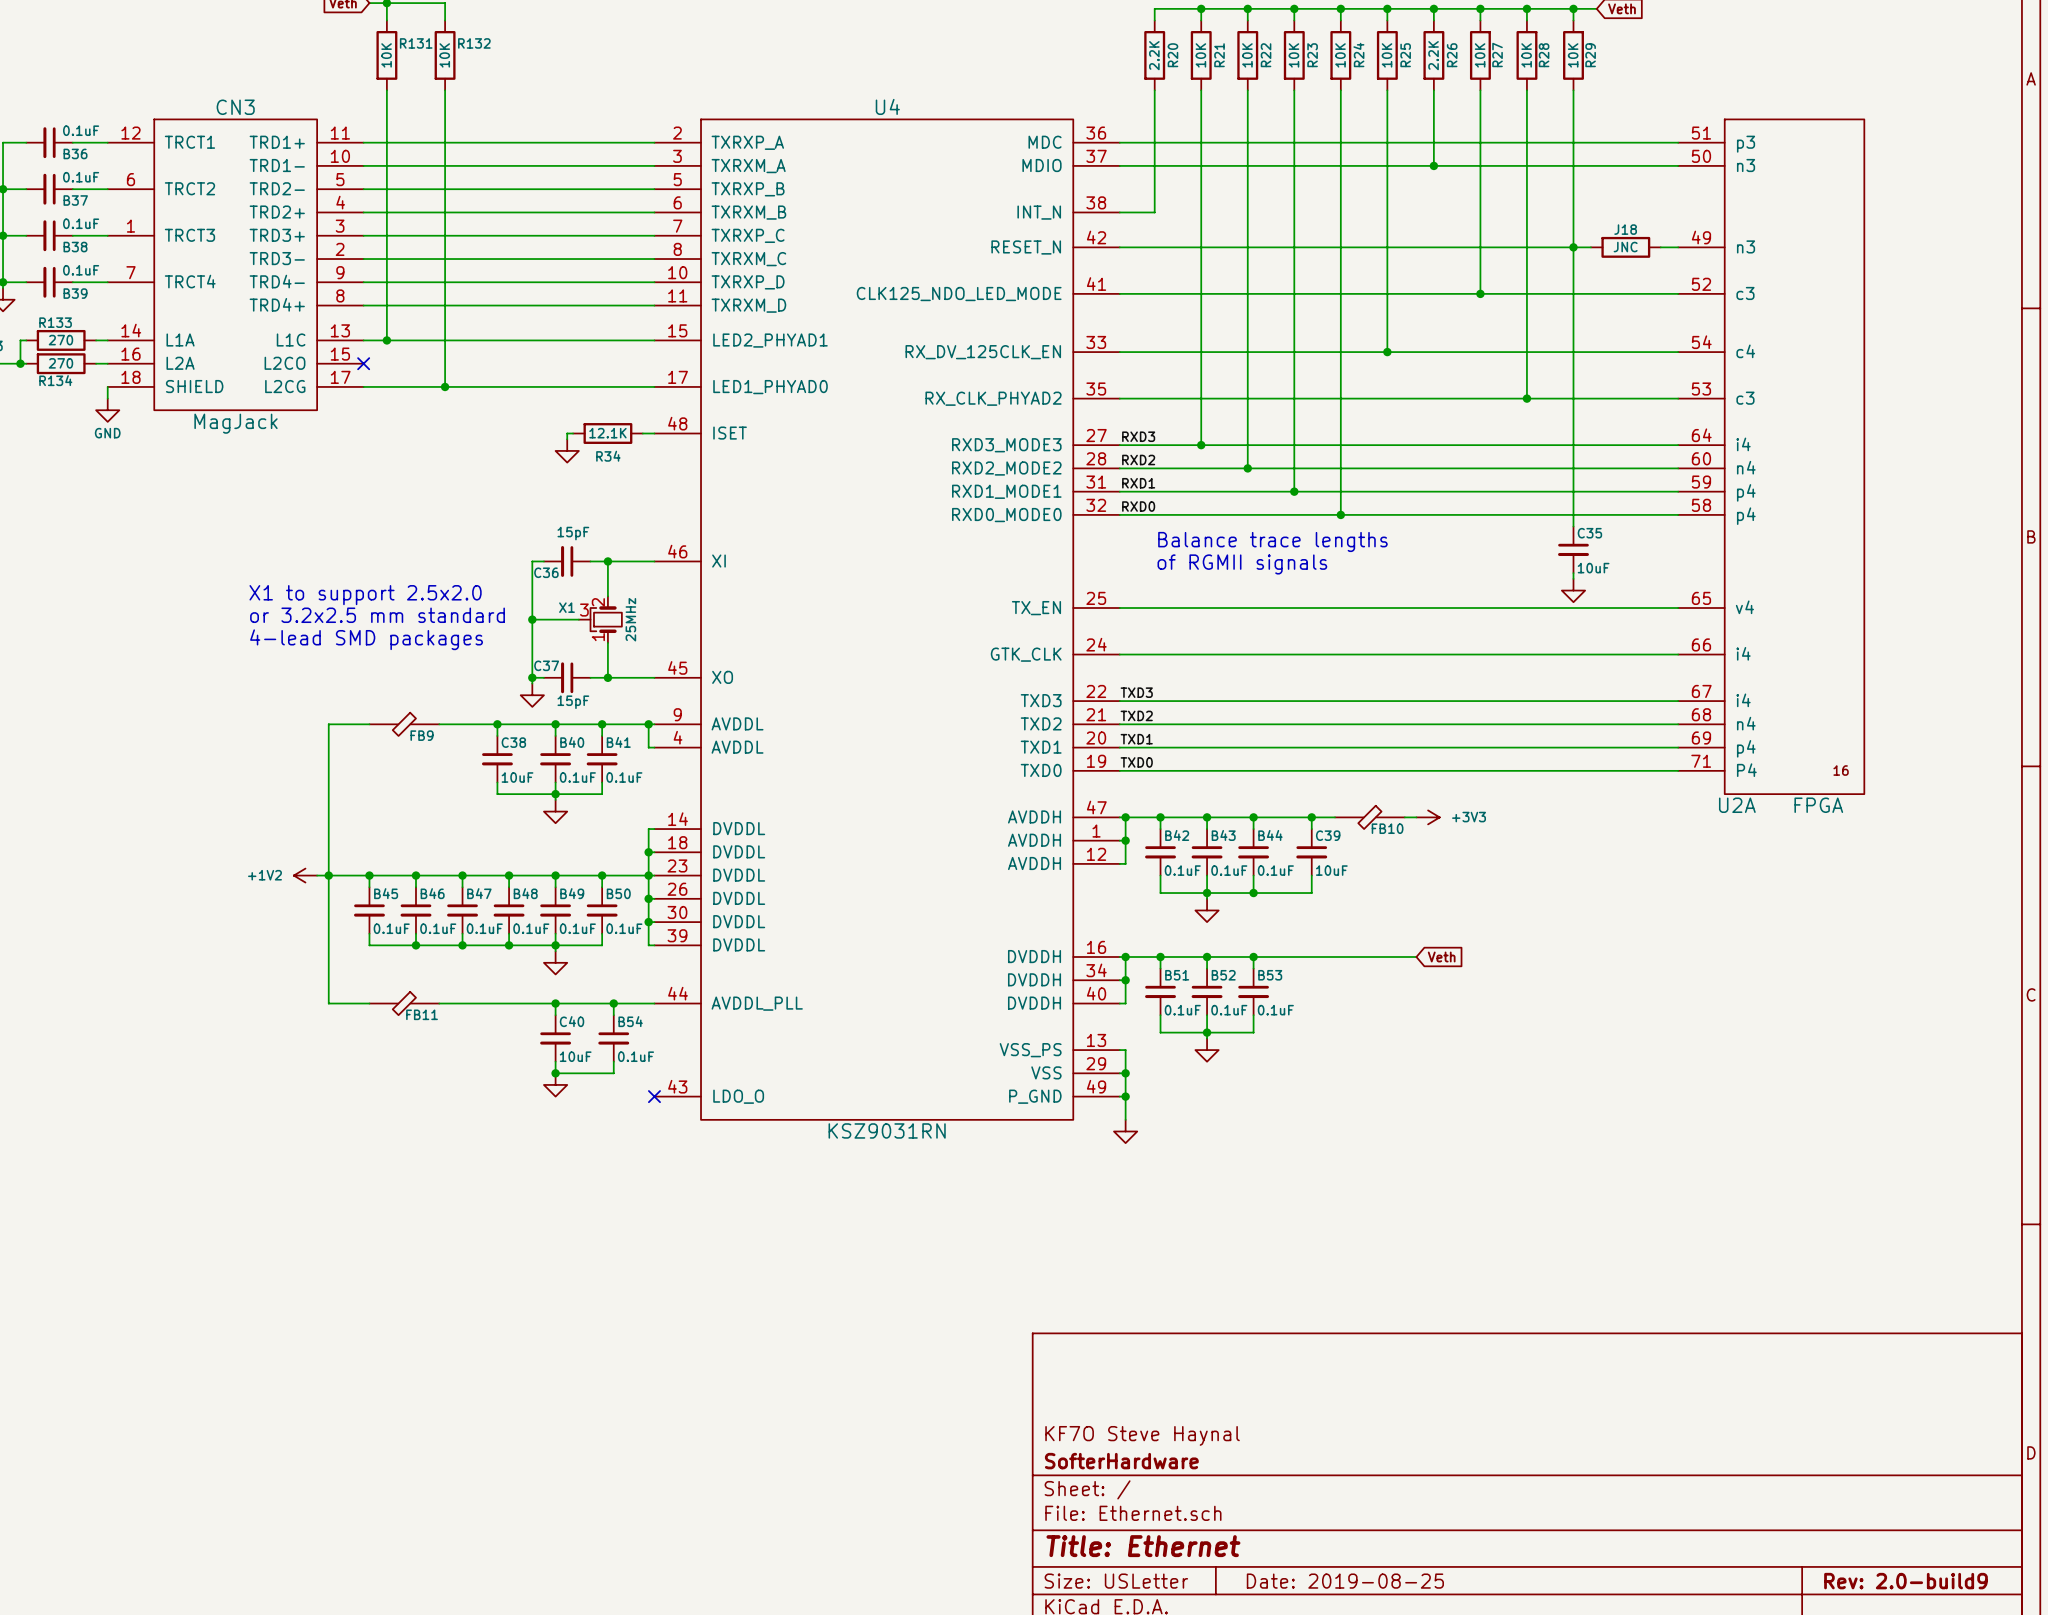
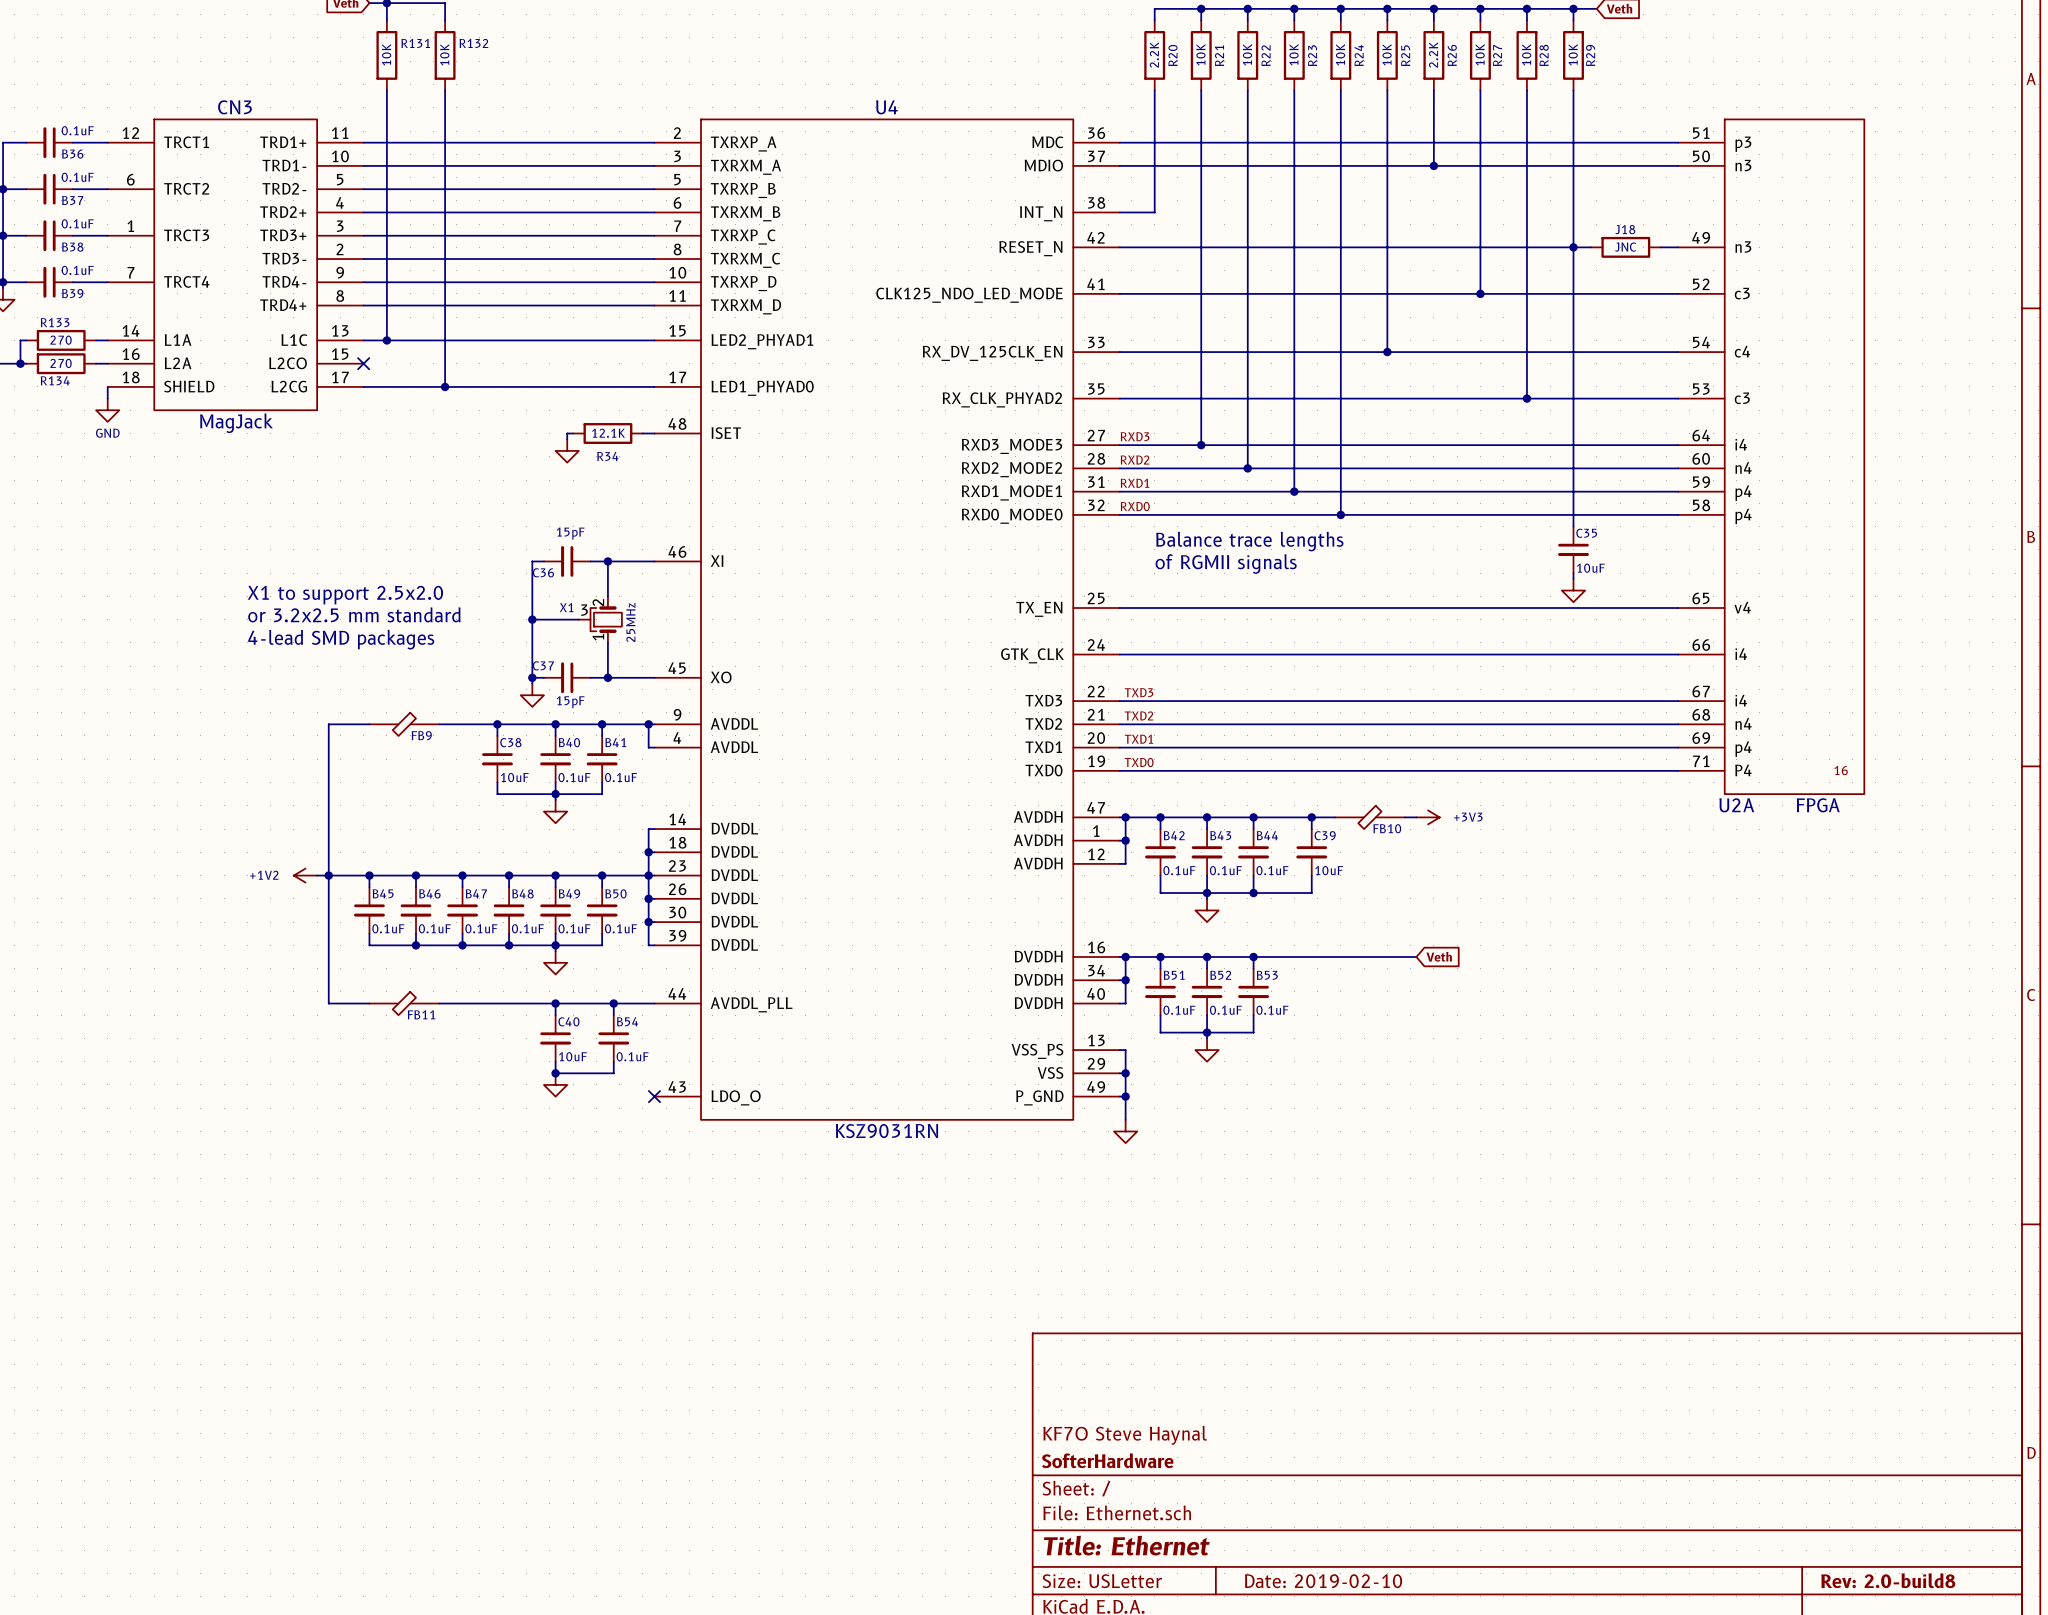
title block: Date: 2019-08-25 (1345, 1581) -> Date: 2019-02-10 (1323, 1581)
title block: Rev: 2.0-build9 (1906, 1581) -> Rev: 2.0-build8 (1888, 1580)

